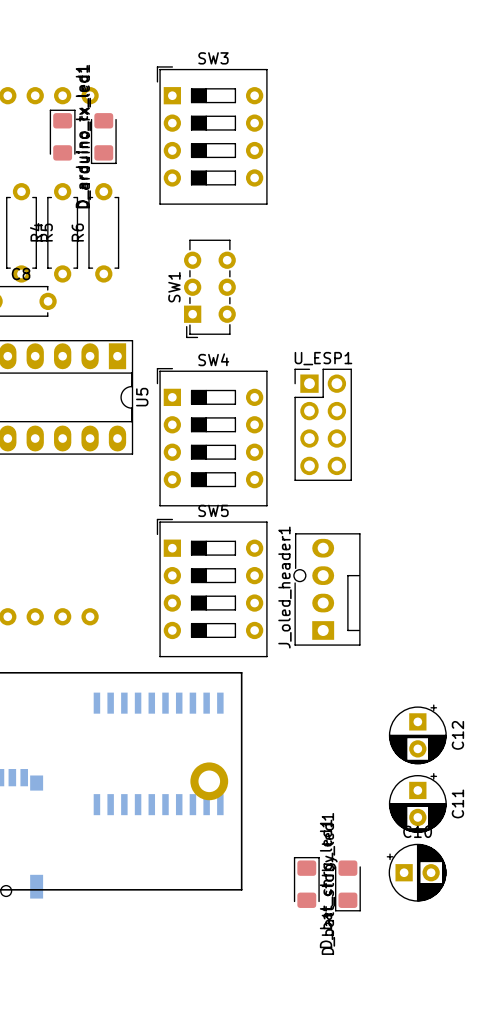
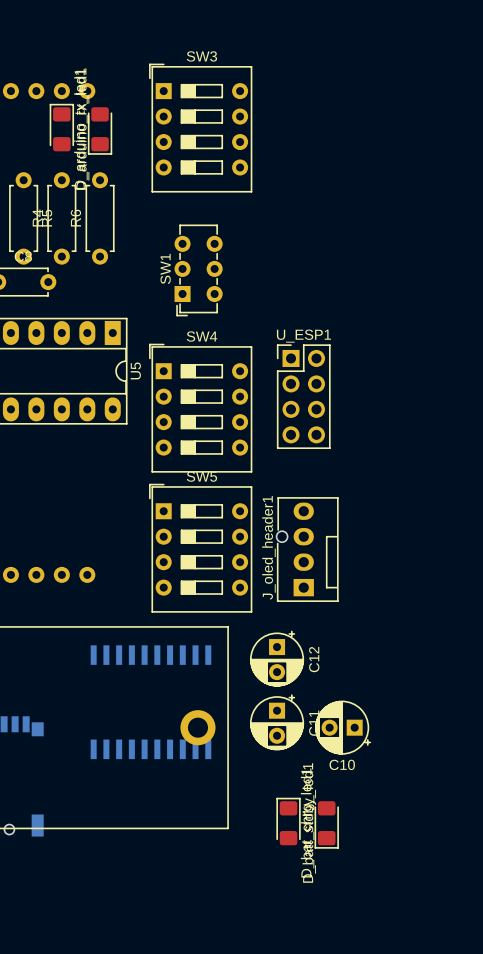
C12 position: (417, 734) -> (277, 658)
C11 position: (417, 802) -> (277, 722)
C10 rotation: 0° (416, 872) -> 180° (343, 727)
C10 position: (416, 872) -> (343, 727)

